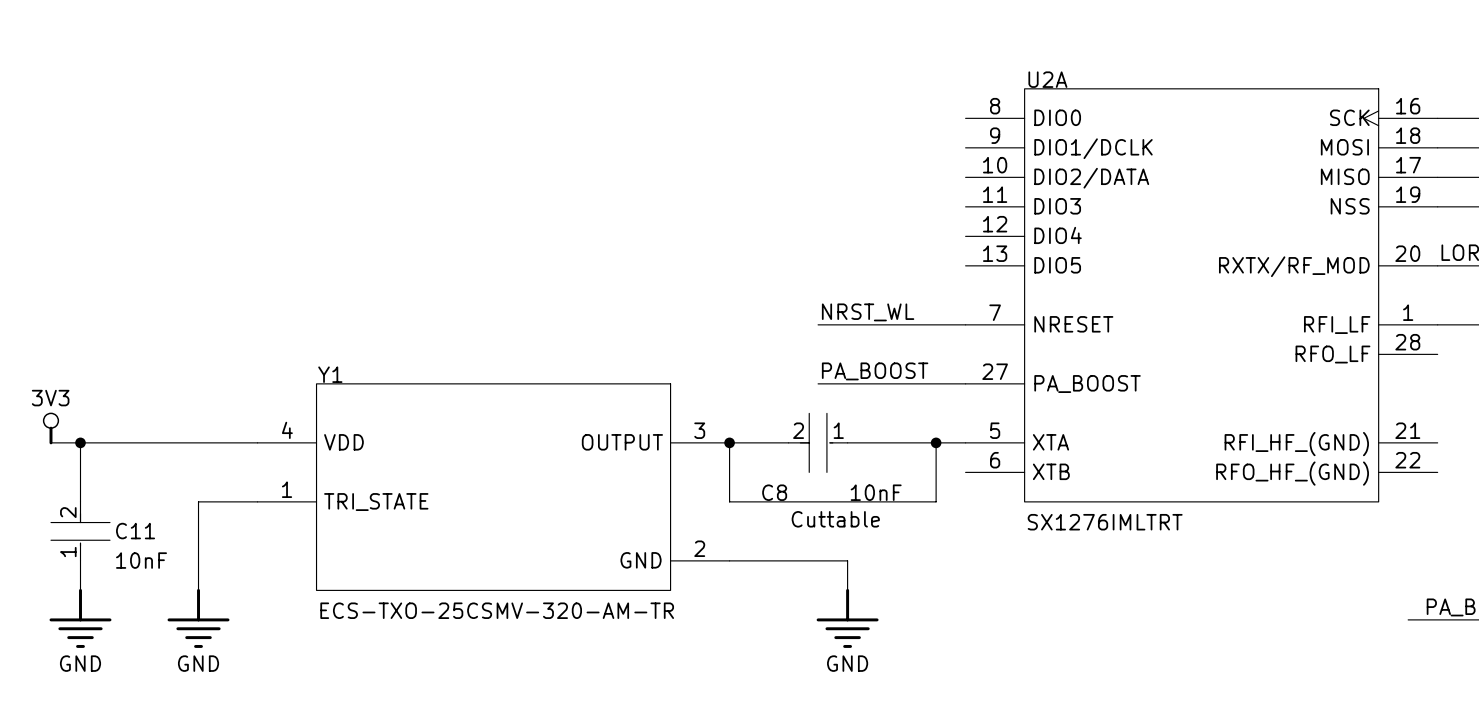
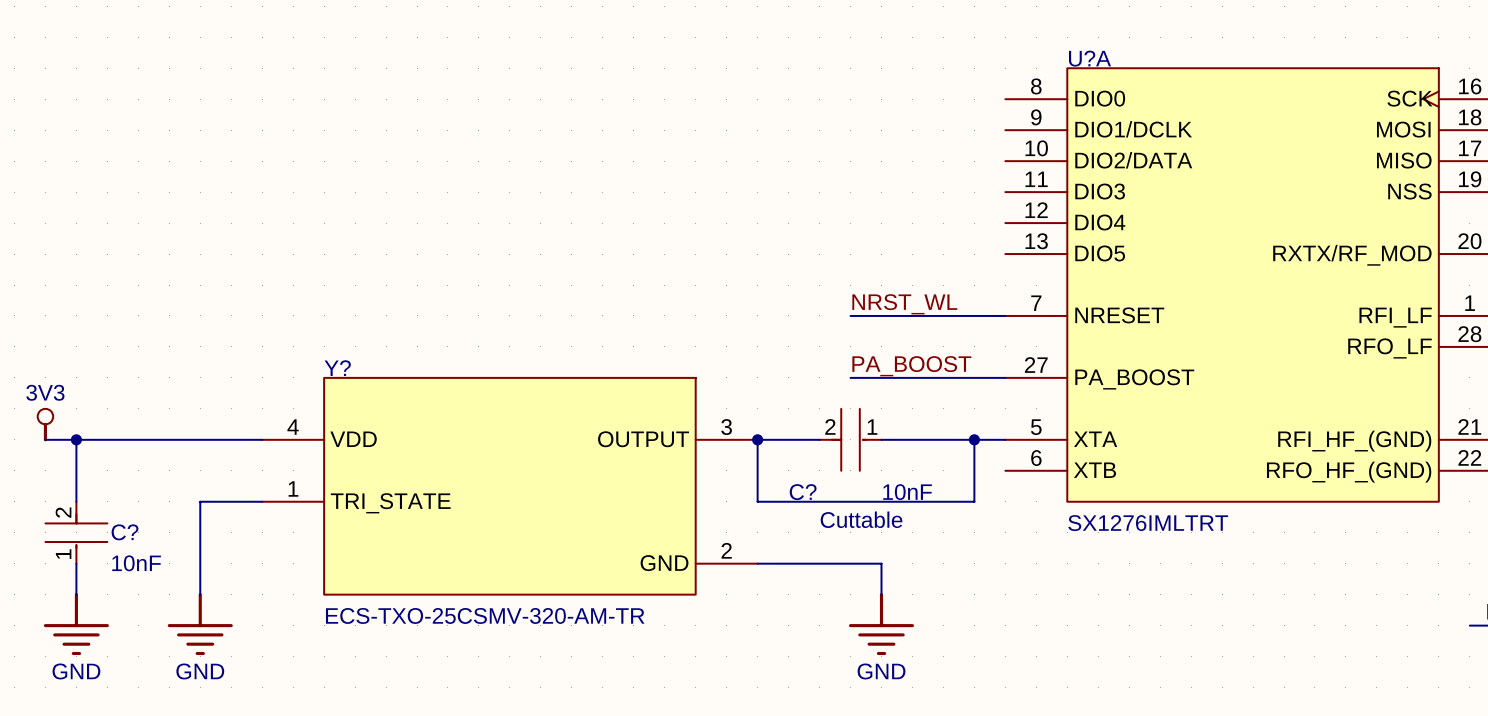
U2A name: U2A (1047, 79) -> U?A (1090, 58)
Y1 name: Y1 (330, 374) -> Y? (337, 368)
C8 name: C8 (774, 492) -> C? (803, 492)
C11 name: C11 (135, 531) -> C? (125, 532)

